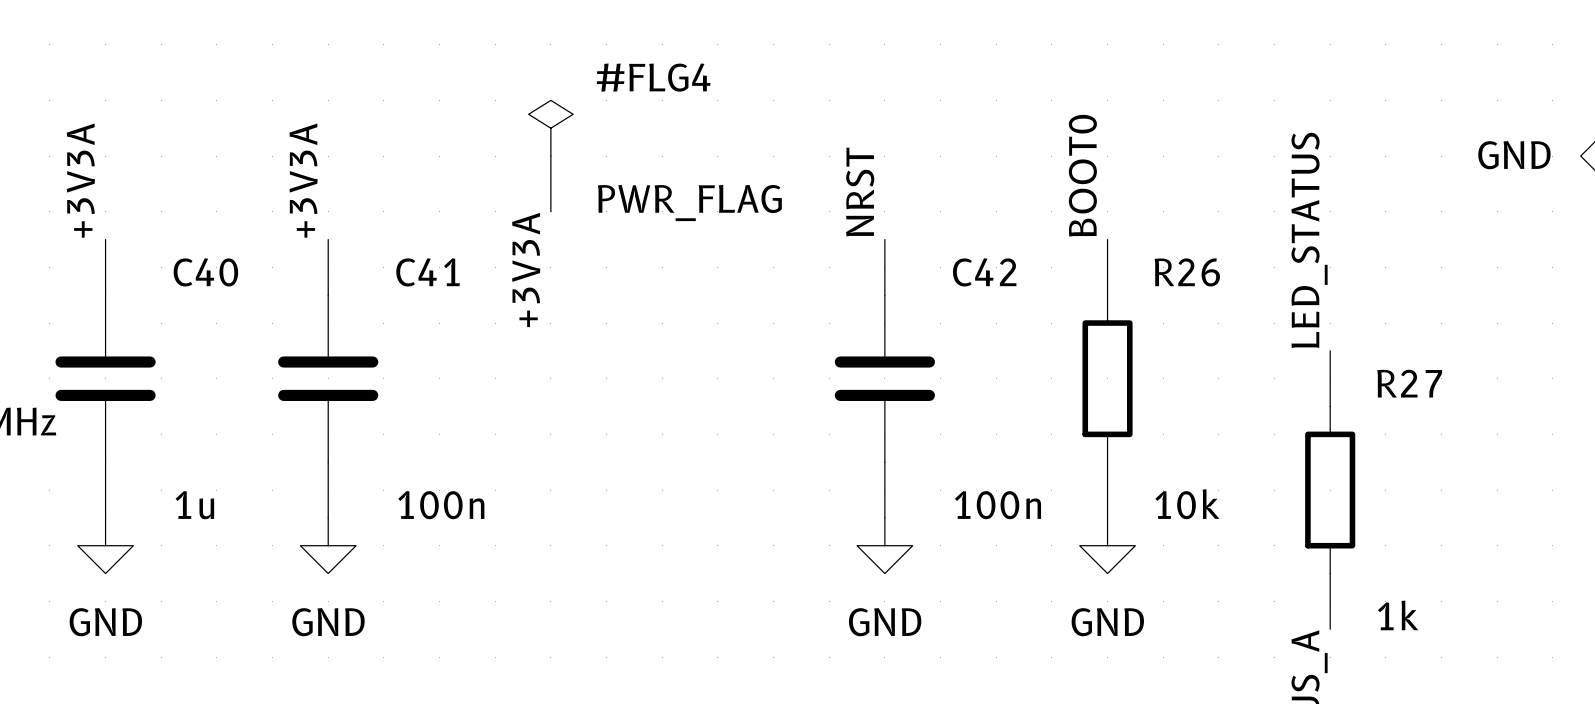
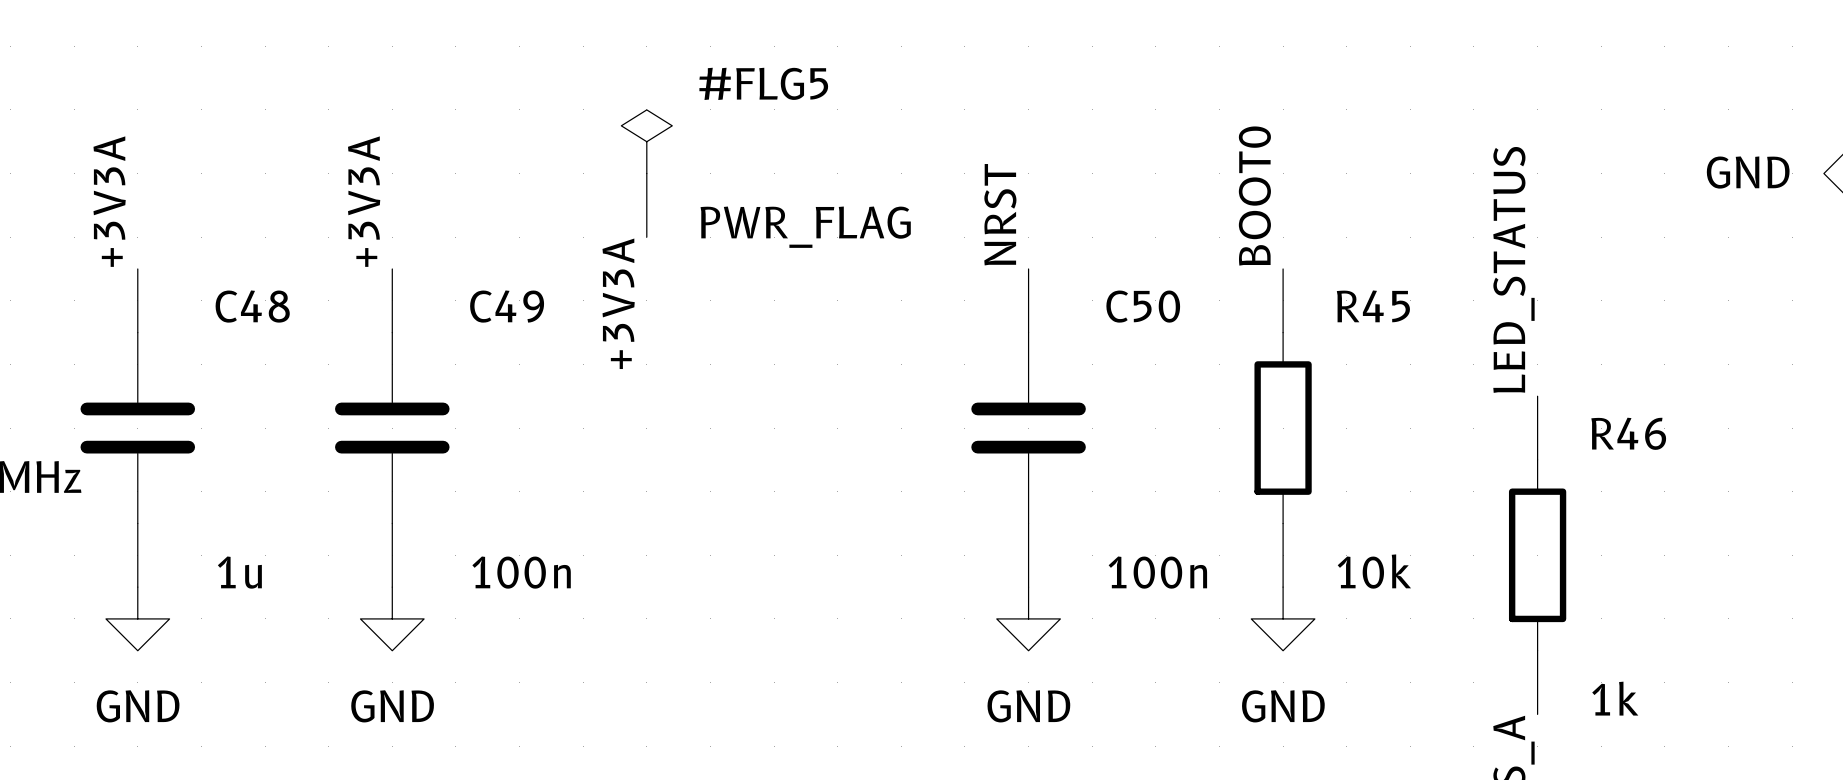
#FLG4 name: #FLG4 (653, 77) -> #FLG5 (763, 83)
C40 name: C40 (205, 272) -> C48 (252, 306)
C41 name: C41 (427, 272) -> C49 (507, 306)
C42 name: C42 (984, 272) -> C50 (1143, 306)
R26 name: R26 (1187, 272) -> R45 (1373, 306)
R27 name: R27 (1409, 383) -> R46 (1628, 433)

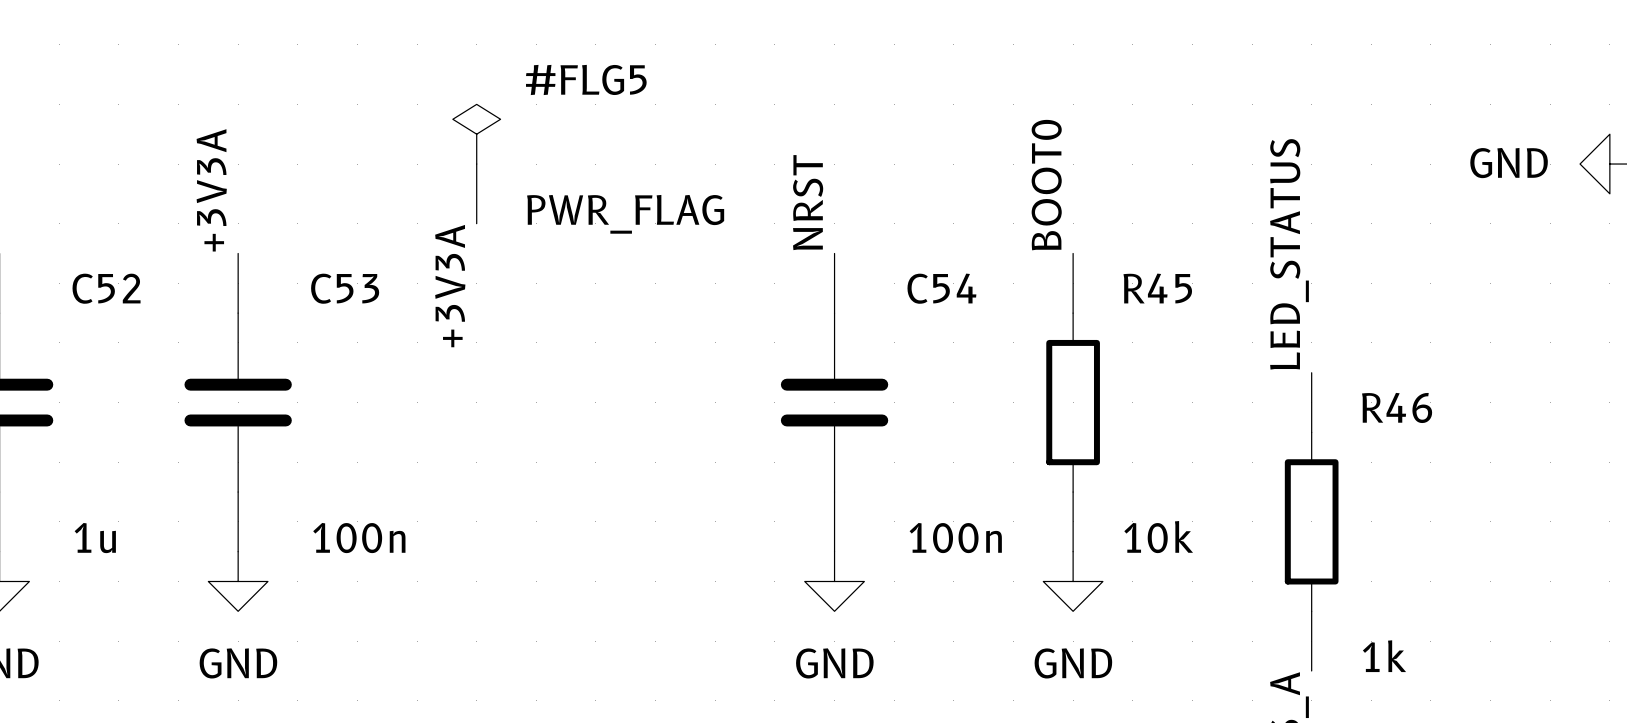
C48 name: C48 (252, 306) -> C52 (106, 288)
C49 name: C49 (507, 306) -> C53 (345, 288)
C50 name: C50 (1143, 306) -> C54 (941, 288)

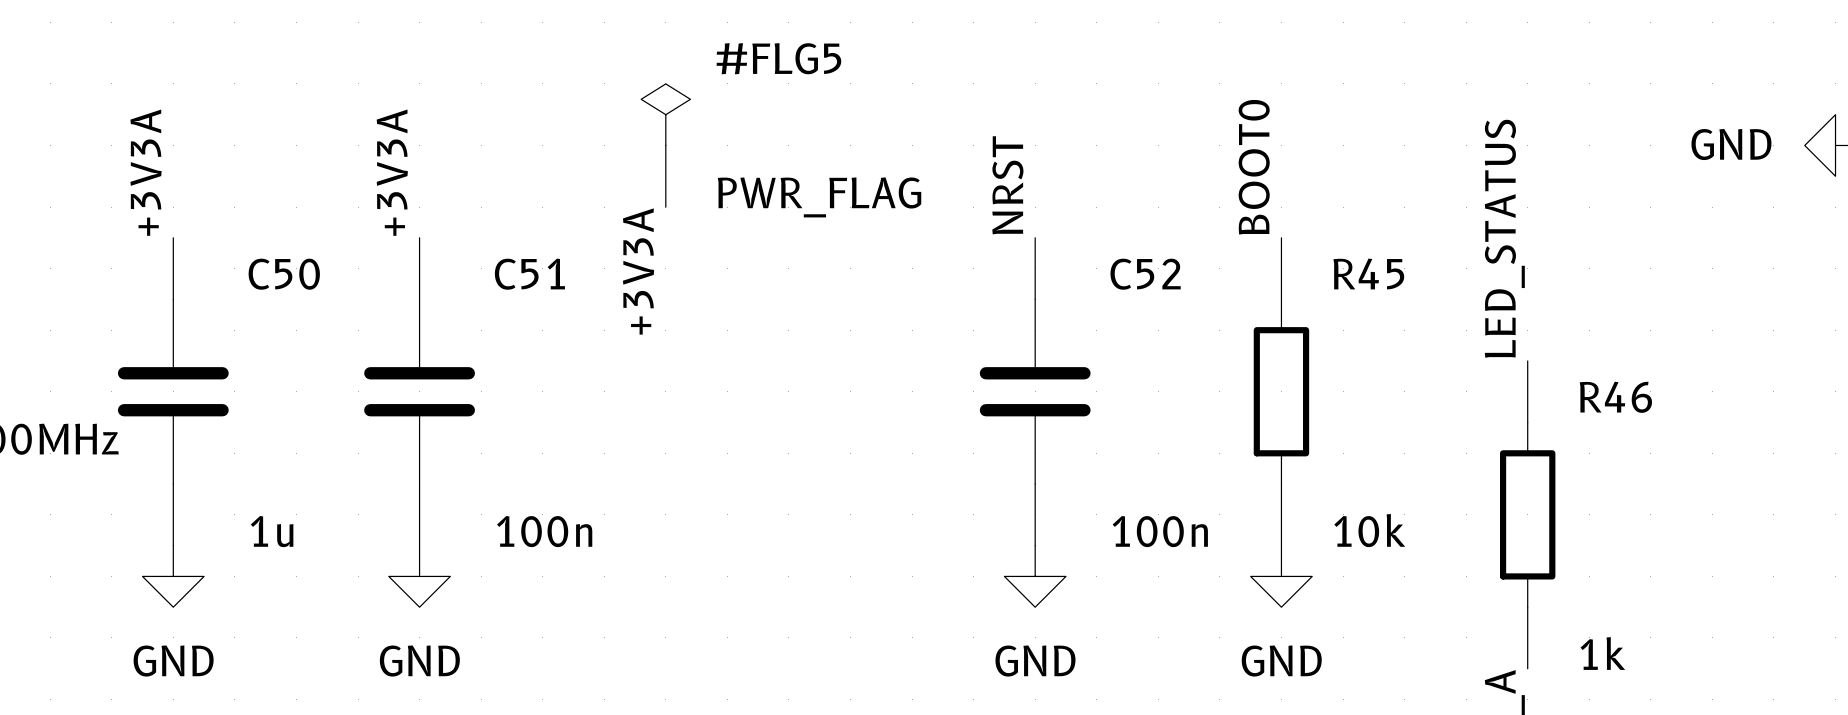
C52 name: C52 (106, 288) -> C50 (284, 274)
C53 name: C53 (345, 288) -> C51 (529, 274)
C54 name: C54 (941, 288) -> C52 (1145, 274)

